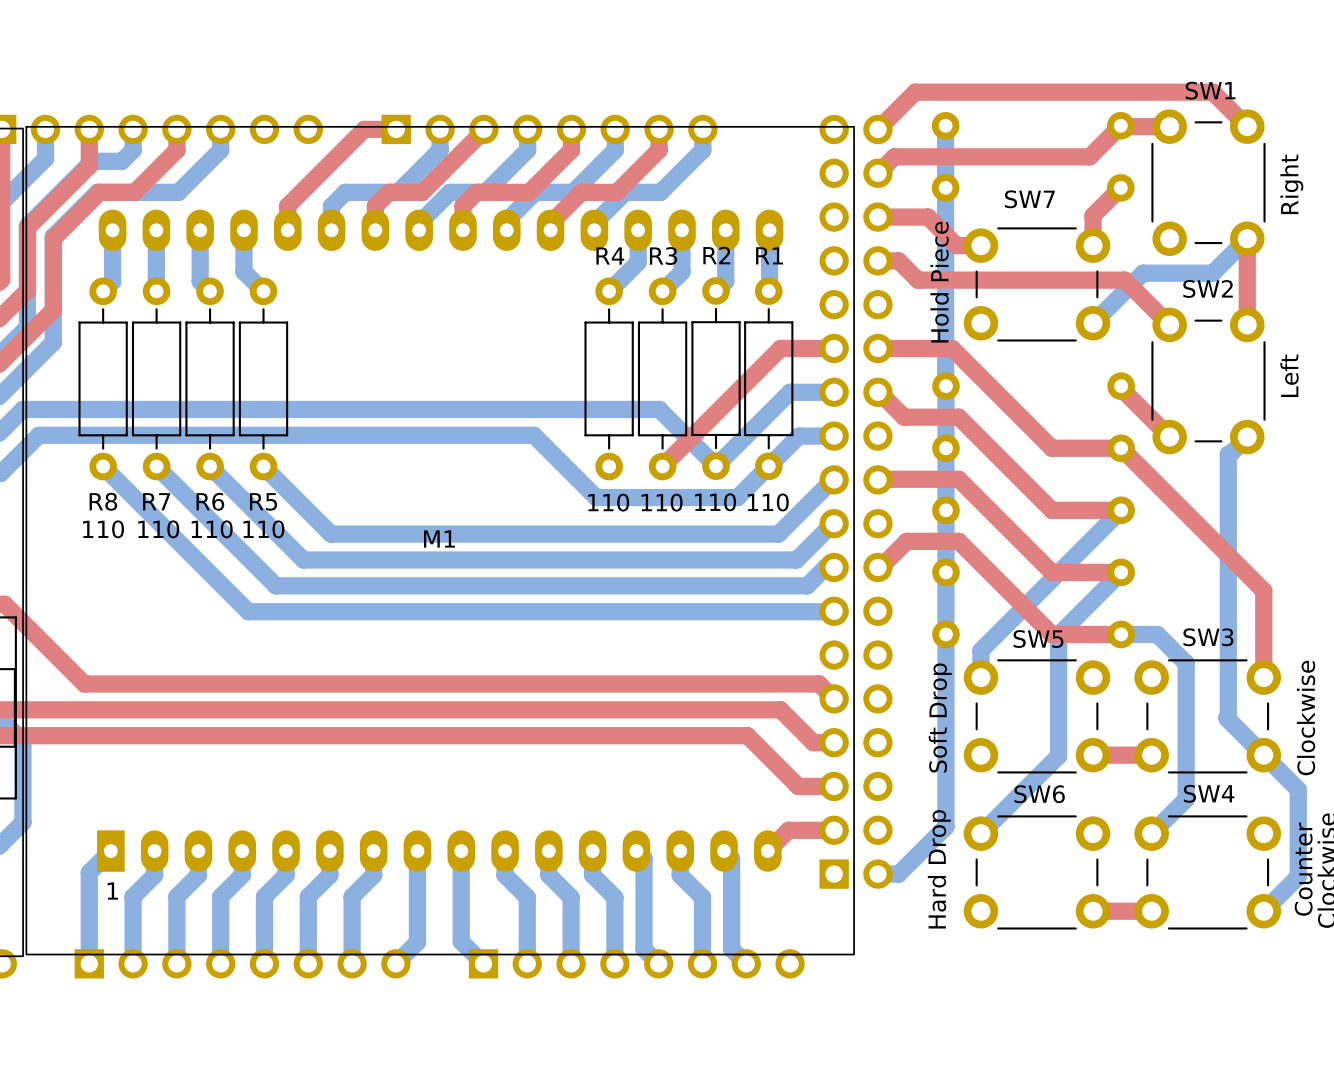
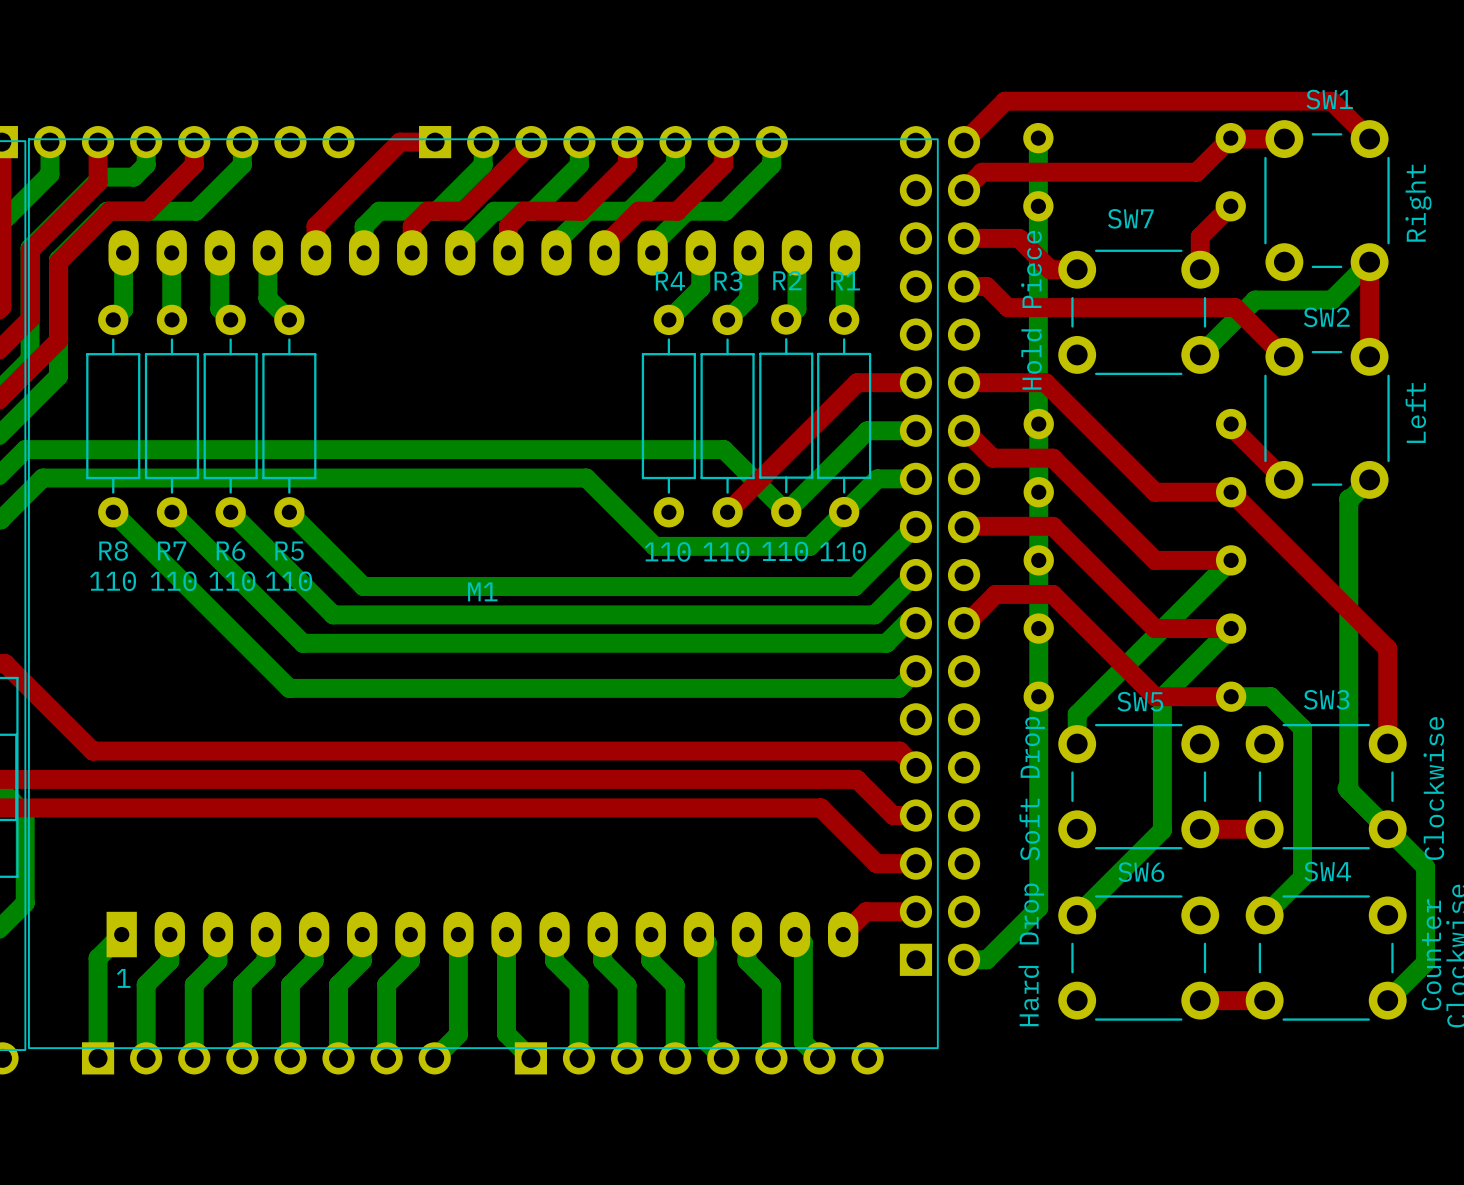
bottom track: (248, 611) (833, 611) -> (272, 671) (289, 688) (898, 688) (915, 671)

